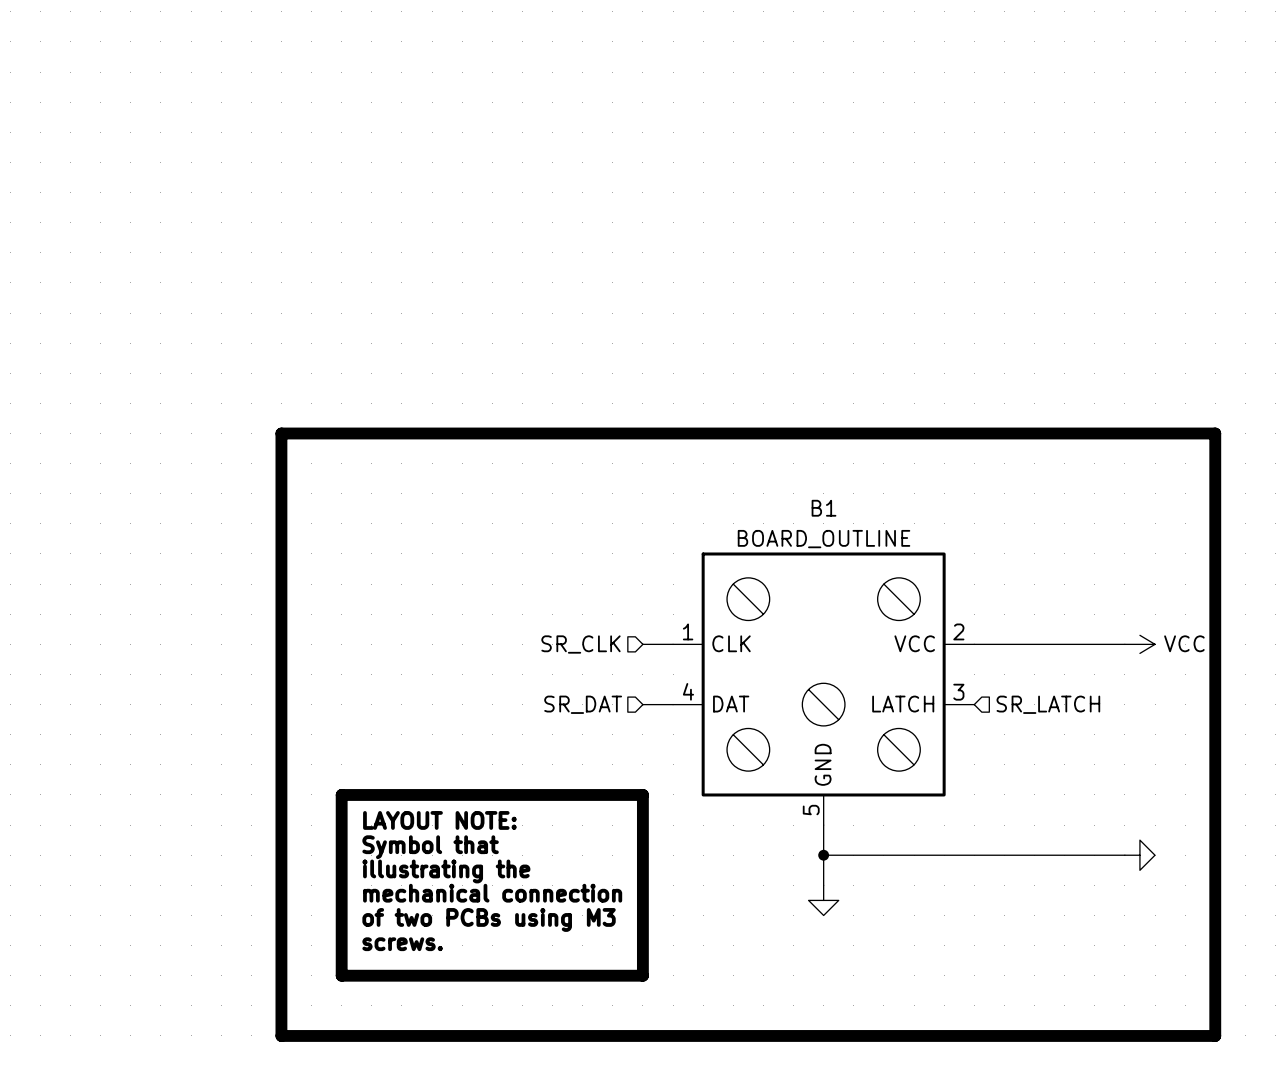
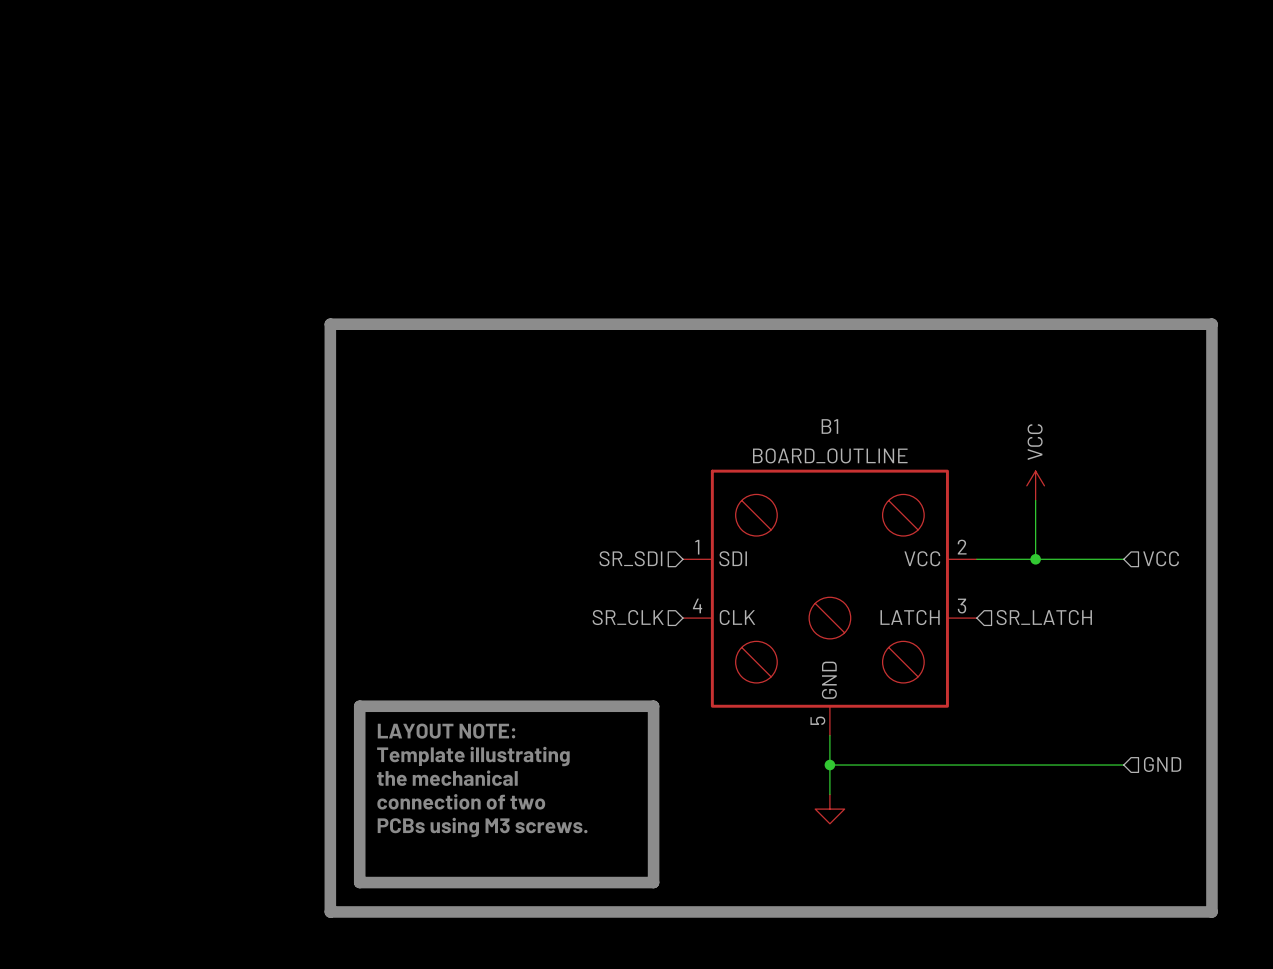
line: (1215, 433) (281, 433) (281, 1035) (1215, 1035) (1215, 1005) -> (1211, 353) (1211, 324) (330, 324) (330, 911) (1211, 911)
wire: none -> (1035, 500) (1035, 559)
B1 pin name: CLK (731, 643) -> SDI (733, 558)
hierarchical label: none -> VCC (1161, 558)
hierarchical label position: SR_CLK (580, 644) -> SR_CLK (628, 617)
hierarchical label: none -> SR_SDI (630, 558)
wire: (642, 644) (673, 644) -> none
junction: none -> (1035, 559)
power symbol rotation: 0° (1139, 644) -> 90° counterclockwise (1035, 485)
power symbol position: VCC (1139, 644) -> VCC (1035, 485)
hierarchical label: SR_DAT (583, 704) -> none
wire: (642, 704) (673, 704) -> none
B1 pin name: DAT (731, 704) -> CLK (737, 617)
text: Symbol that (430, 847) -> Template illustrating (473, 756)
hierarchical label: none -> GND (1162, 764)
power symbol: (1139, 855) -> none
text: illustrating the (446, 871) -> the mechanical (447, 778)
text: mechanical connection (492, 893) -> connection of two (461, 801)
text: of two PCBs using M3 (489, 919) -> PCBs using M3 screws. (482, 827)
text: screws. (402, 944) -> none

